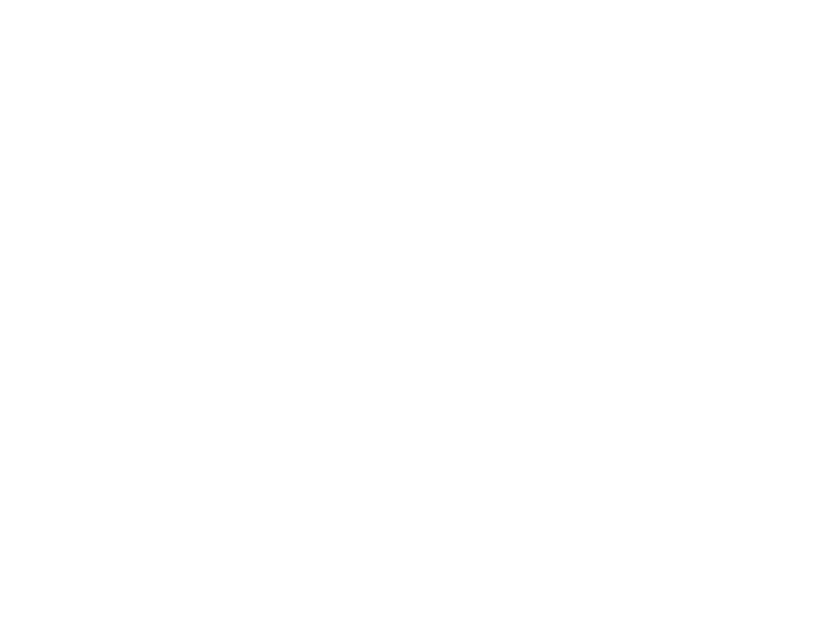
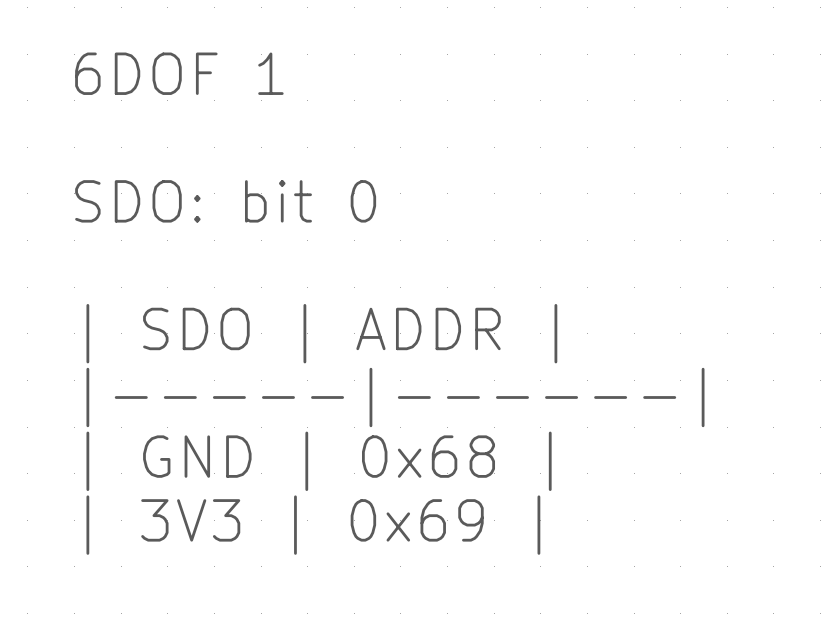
text: none -> 6DOF 1 (179, 73)
text: none -> SDO: bit 0 (225, 201)
text: none -> | SDO | ADDR | (321, 333)
text: none -> |-----|------| (395, 397)
text: none -> | GND | 0x68 | (319, 461)
text: none -> | 3V3 | 0x69 | (313, 525)

